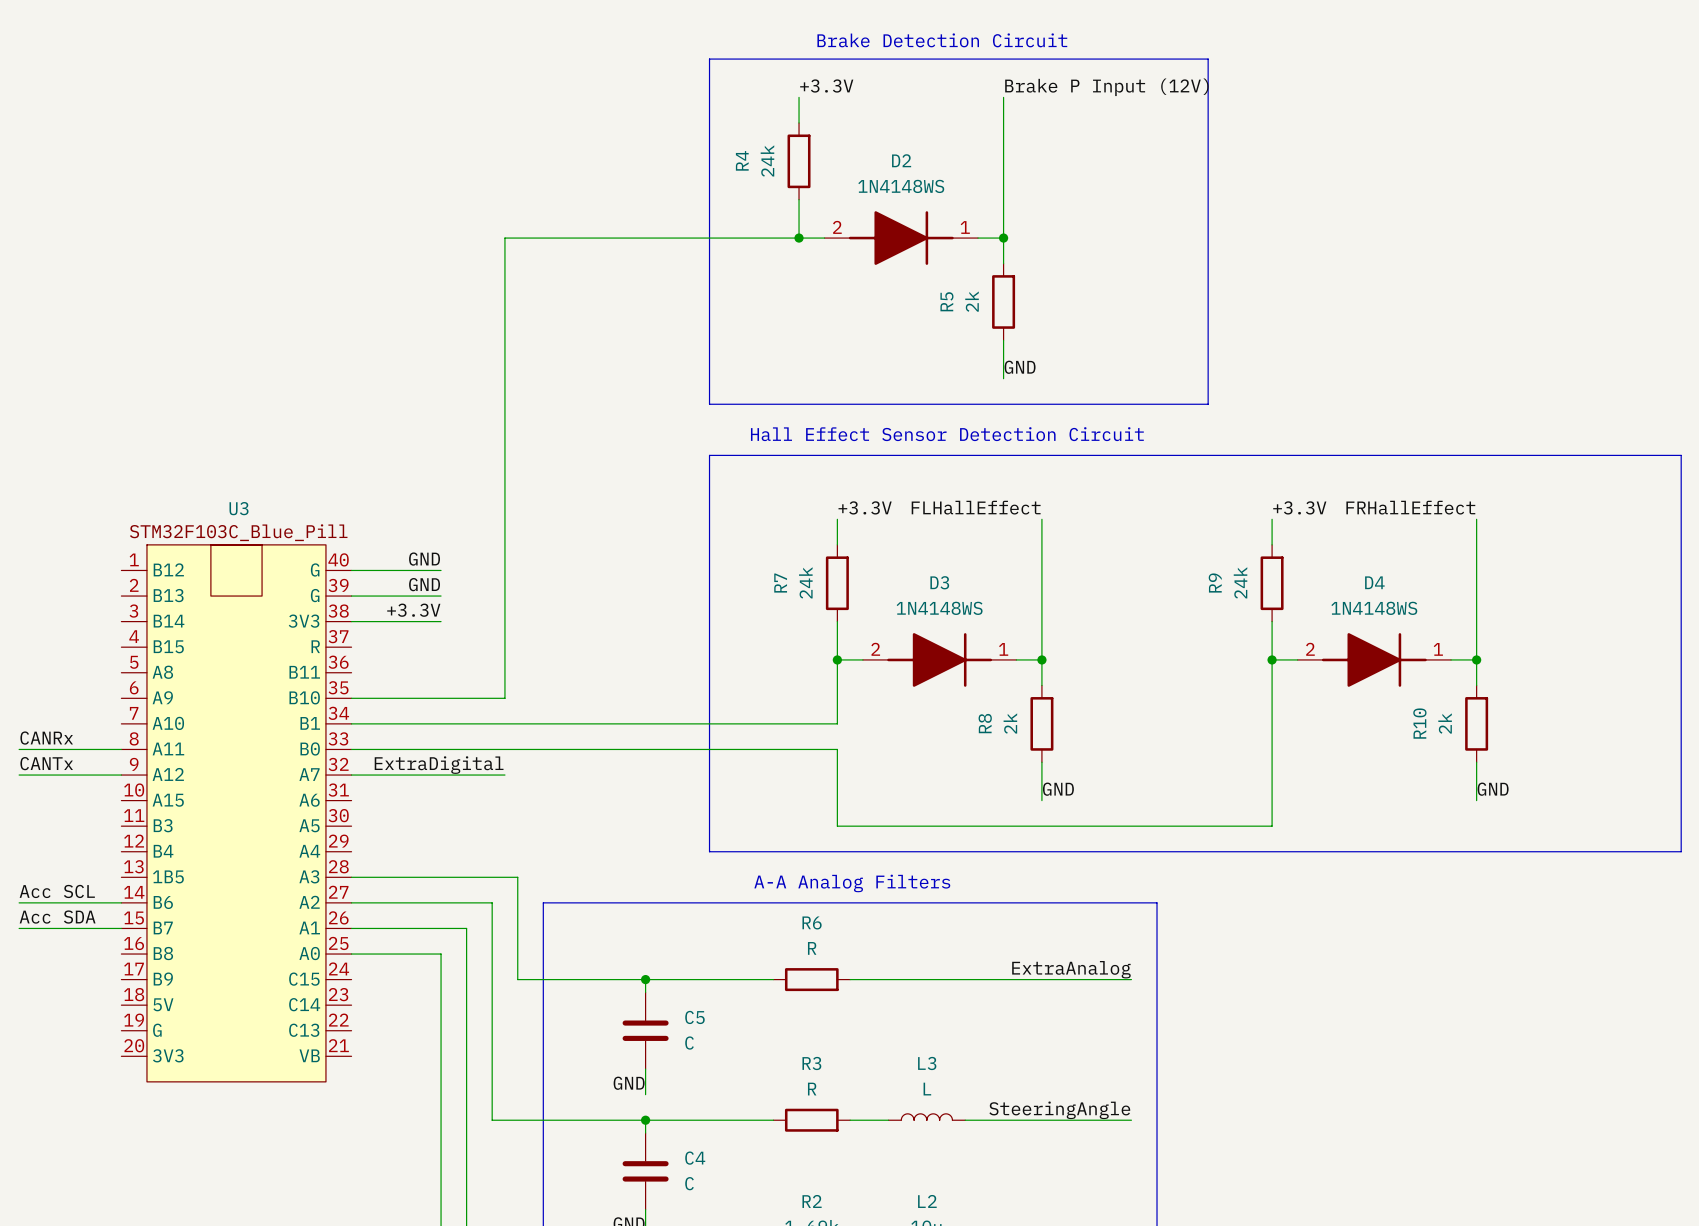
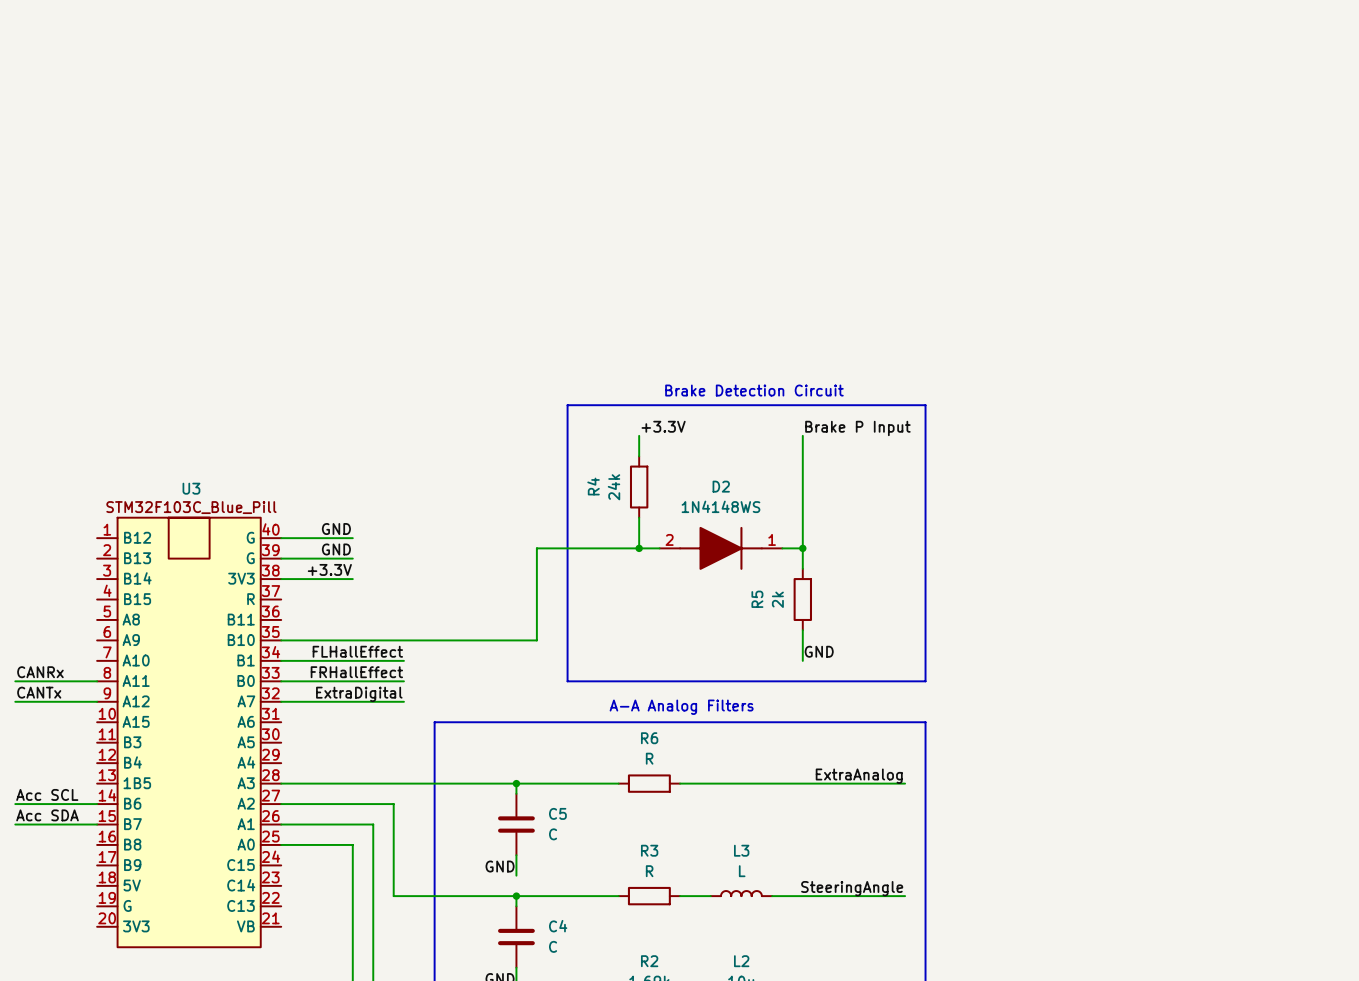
text: Brake Detection Circuit (942, 40) -> none
line: (709, 59) (1208, 59) (1208, 404) (709, 404) (709, 59) -> none
label: +3.3V (826, 86) -> none
label: Brake P Input (12V) (1106, 87) -> none
wire: (799, 97) (799, 122) -> none
wire: (1003, 97) (1003, 263) -> none
R4 position: (799, 161) -> (639, 487)
wire: (799, 199) (799, 238) -> none
junction: (799, 238) -> none
wire: (824, 238) (504, 238) (504, 698) (441, 698) -> none
D2 position: (901, 238) -> (720, 548)
wire: (978, 238) (1003, 238) -> none
junction: (1003, 238) -> none
R5 position: (1003, 301) -> (802, 599)
wire: (1003, 340) (1003, 378) -> none
label: GND (1020, 367) -> none
text: Hall Effect Sensor Detection Circuit (947, 434) -> none
text: none -> Brake Detection Circuit (754, 390)
line: (709, 506) (709, 455) (1681, 455) (1681, 851) (1157, 851) -> (567, 405) (925, 405) (925, 681)
label position: +3.3V (865, 507) -> +3.3V (663, 426)
label: FLHallEffect (976, 507) -> none
label: +3.3V (1299, 507) -> none
label: FRHallEffect (1410, 507) -> none
wire: (837, 519) (837, 544) -> (639, 435) (639, 456)
wire: (1041, 519) (1041, 685) -> (802, 435) (802, 568)
wire: (1272, 519) (1272, 544) -> none
wire: (1476, 519) (1476, 685) -> none
label: none -> Brake P Input (857, 428)
label: GND (424, 559) -> none
wire: (351, 570) (441, 570) -> (281, 538) (352, 538)
R7: 24k (837, 583) -> none
R9: 24k (1272, 583) -> none
label: GND (424, 584) -> none
wire: (351, 596) (441, 596) -> none
label position: +3.3V (413, 610) -> +3.3V (329, 569)
wire: (351, 621) (441, 621) -> none
wire: (837, 621) (837, 723) (441, 723) -> none
wire: (1272, 621) (1272, 826) (837, 826) (837, 749) (351, 749) -> none
wire: none -> (639, 517) (639, 548)
wire: (837, 659) (862, 659) -> none
junction position: (837, 659) -> (639, 548)
D3: 1N4148WS (939, 659) -> none
wire: (1016, 659) (1041, 659) -> (782, 548) (802, 548)
junction position: (1041, 659) -> (802, 548)
wire: (1272, 659) (1297, 659) -> none
junction: (1272, 659) -> none
D4: 1N4148WS (1374, 659) -> none
wire: (1451, 659) (1476, 659) -> none
junction: (1476, 659) -> none
label: none -> GND (336, 529)
wire: none -> (659, 548) (536, 548) (536, 640) (281, 640)
label: none -> GND (336, 549)
R8: 2k (1041, 723) -> none
R10: 2k (1476, 723) -> none
label position: CANRx (46, 738) -> CANRx (40, 672)
wire: (19, 749) (121, 749) -> (15, 681) (97, 681)
wire: (1041, 762) (1041, 800) -> (802, 630) (802, 660)
wire: (1476, 762) (1476, 800) -> none
label position: CANTx (46, 763) -> CANTx (39, 692)
label position: ExtraDigital (439, 765) -> ExtraDigital (359, 694)
wire: (19, 775) (121, 775) -> (15, 701) (97, 701)
wire: (351, 775) (504, 775) -> (281, 681) (403, 681)
label position: GND (1058, 789) -> GND (819, 651)
label: GND (1493, 789) -> none
U3 position: (236, 813) -> (189, 732)
label: none -> FLHallEffect (357, 651)
wire: none -> (281, 660) (403, 660)
label: none -> FRHallEffect (356, 672)
wire: (504, 877) (517, 877) (517, 979) -> (281, 783) (414, 783)
label position: Acc SCL (57, 891) -> Acc SCL (47, 794)
wire: (19, 902) (121, 902) -> (15, 804) (97, 804)
wire: (351, 902) (492, 902) (492, 1005) -> (281, 804) (393, 804)
label position: Acc SDA (57, 917) -> Acc SDA (47, 815)
wire: (19, 928) (121, 928) -> (15, 824) (97, 824)
wire: (351, 928) (466, 928) (466, 1030) -> (281, 824) (373, 824)
wire: (351, 954) (441, 954) (441, 1056) -> (281, 844) (352, 844)

